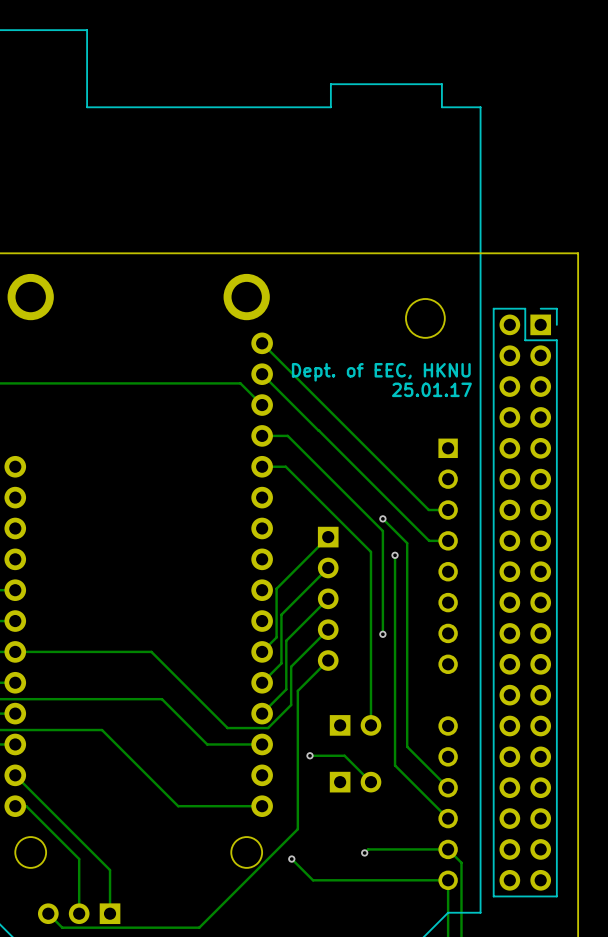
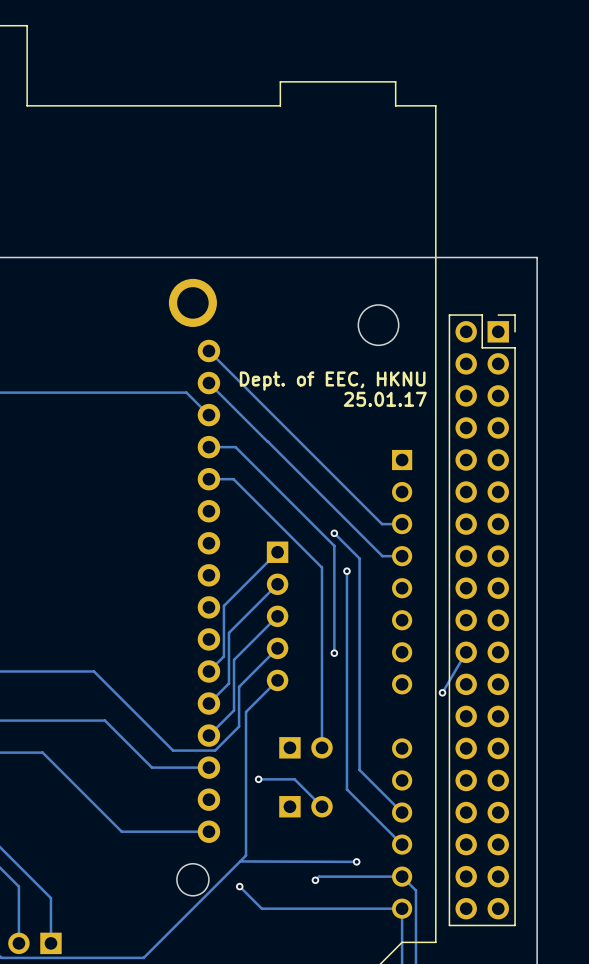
track: none -> (466, 652) (442, 692)
via: none -> (442, 692)
track: none -> (240, 861) (356, 861)
via: none -> (356, 861)

